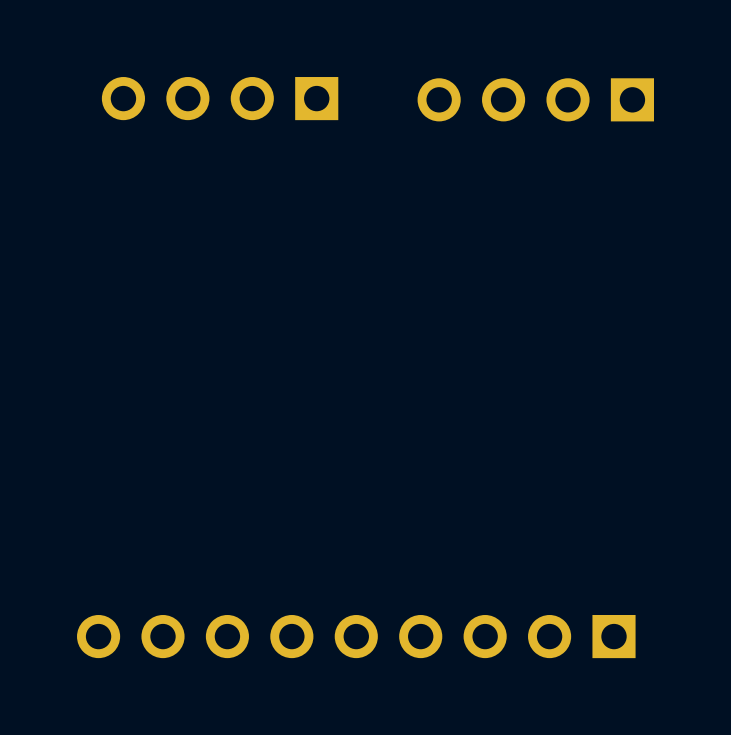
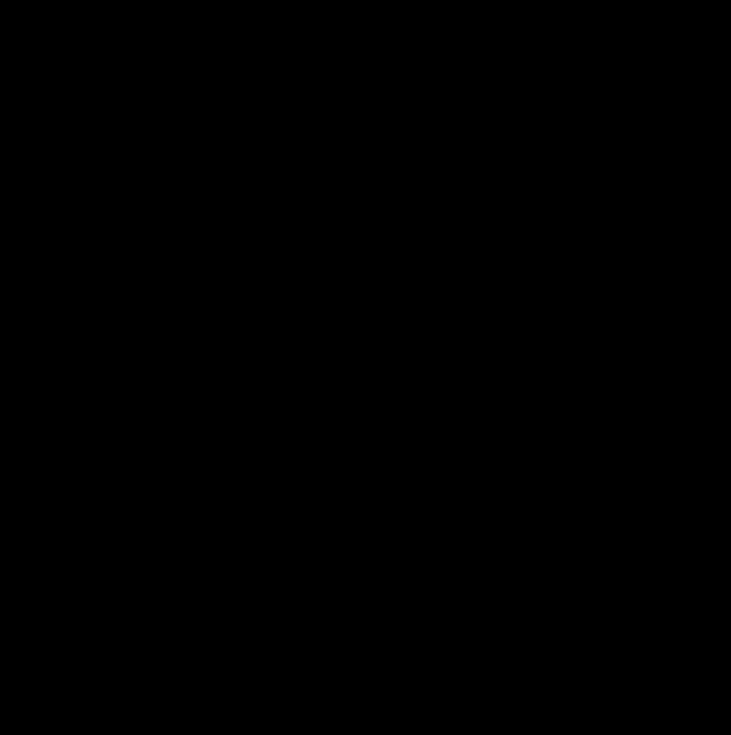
part: (220, 98) -> none
part: (535, 99) -> none
part: (356, 636) -> none

